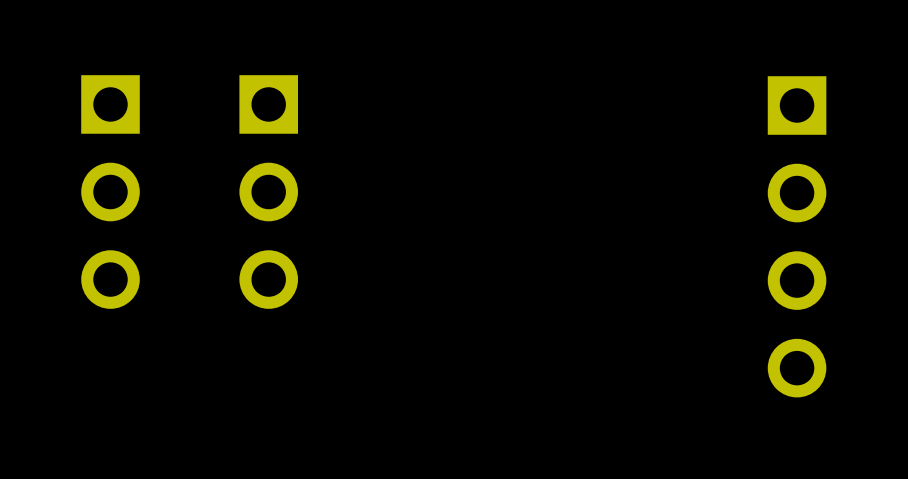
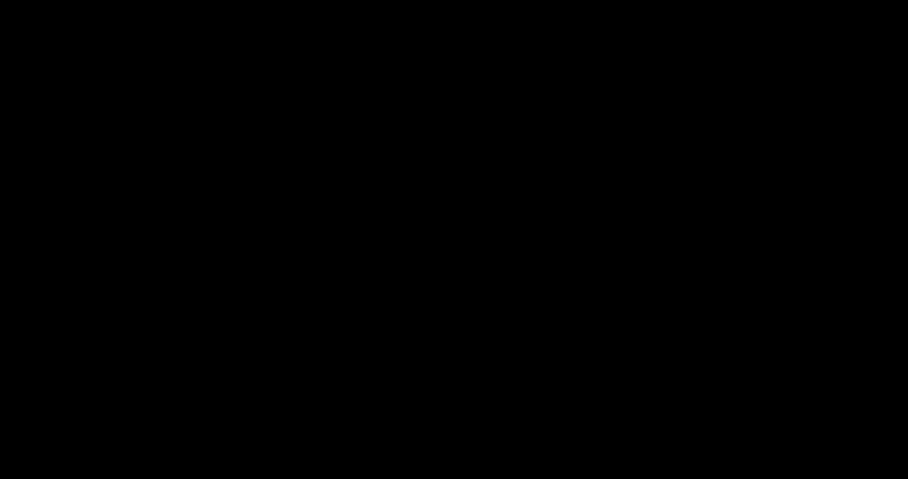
part: (110, 192) -> none
part: (268, 192) -> none
part: (797, 236) -> none

